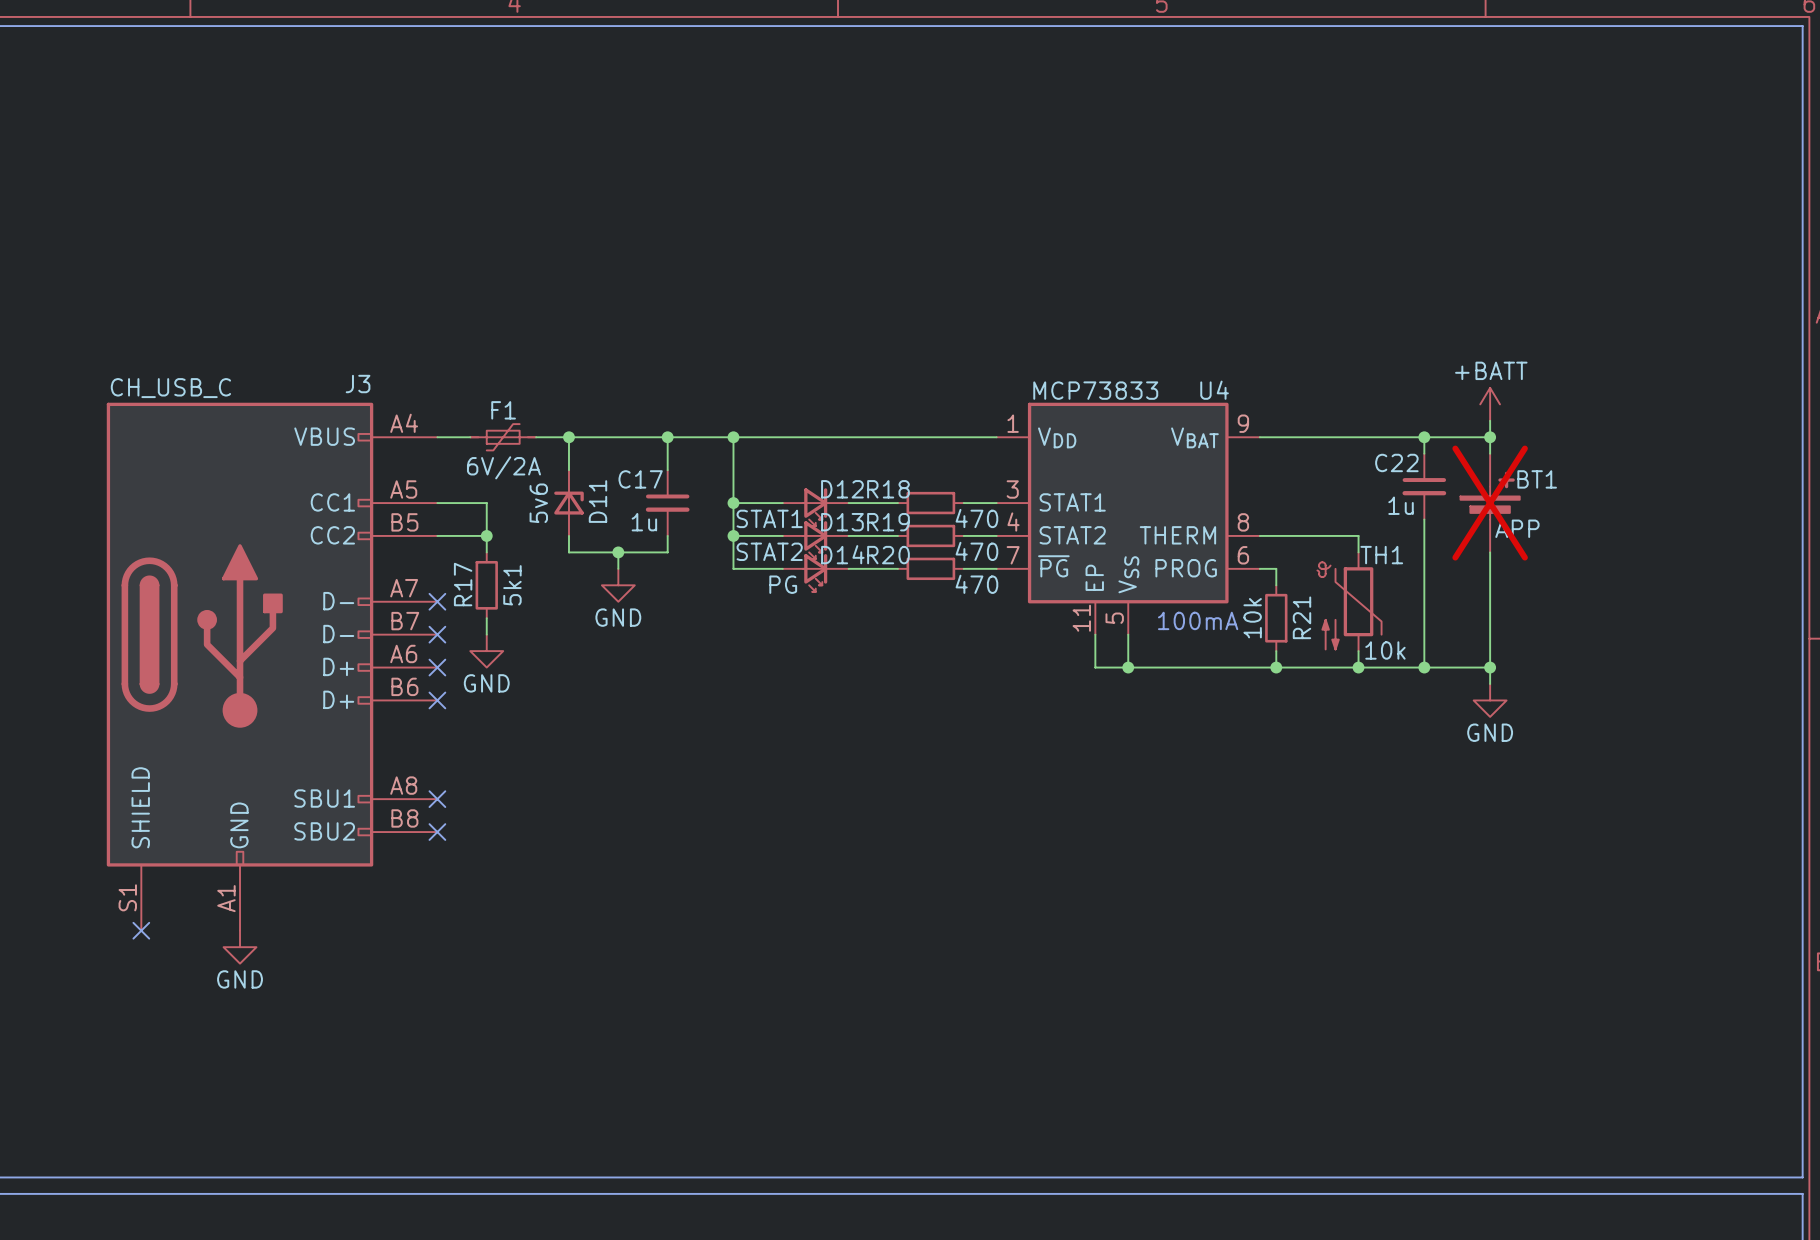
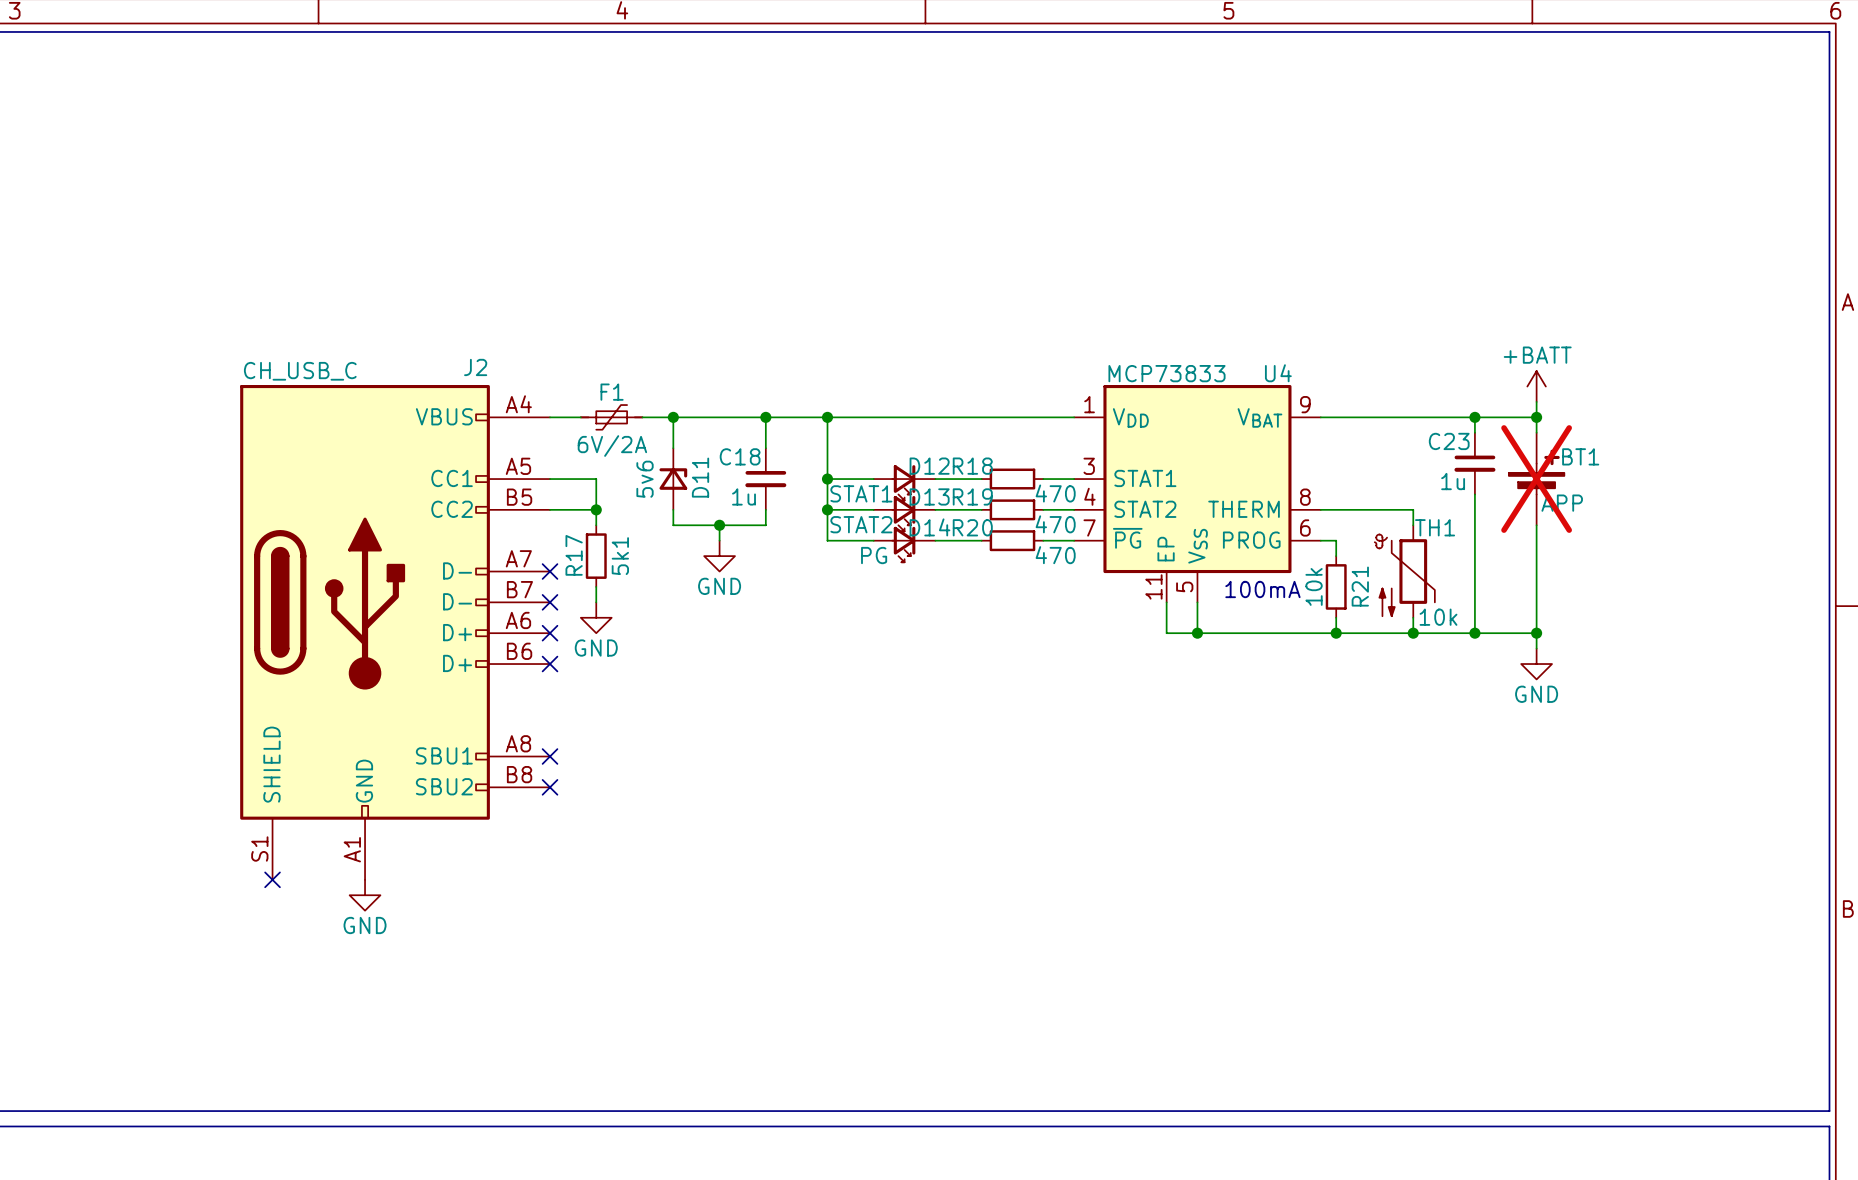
J3 name: J3 (358, 384) -> J2 (475, 367)
C22 name: C22 (1396, 462) -> C23 (1449, 441)
C17 name: C17 (640, 479) -> C18 (740, 456)

